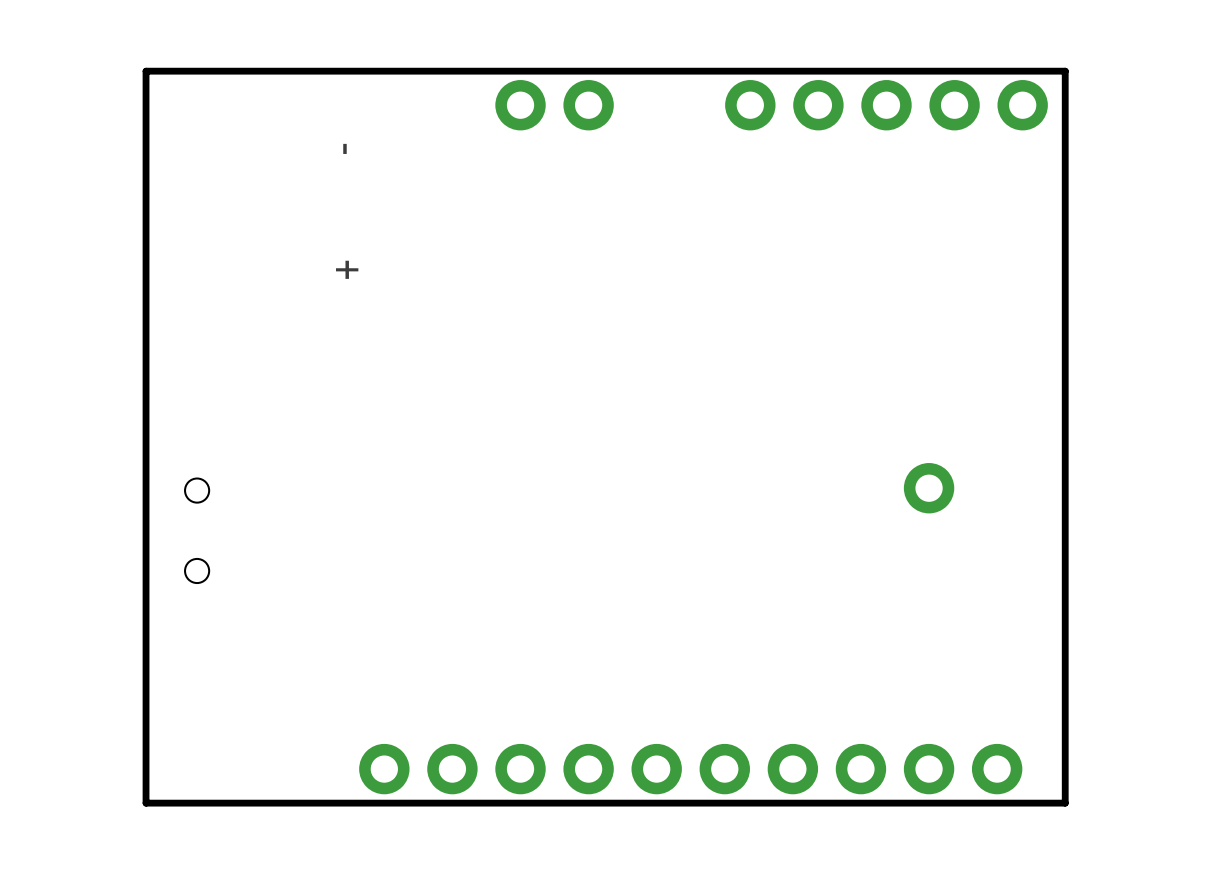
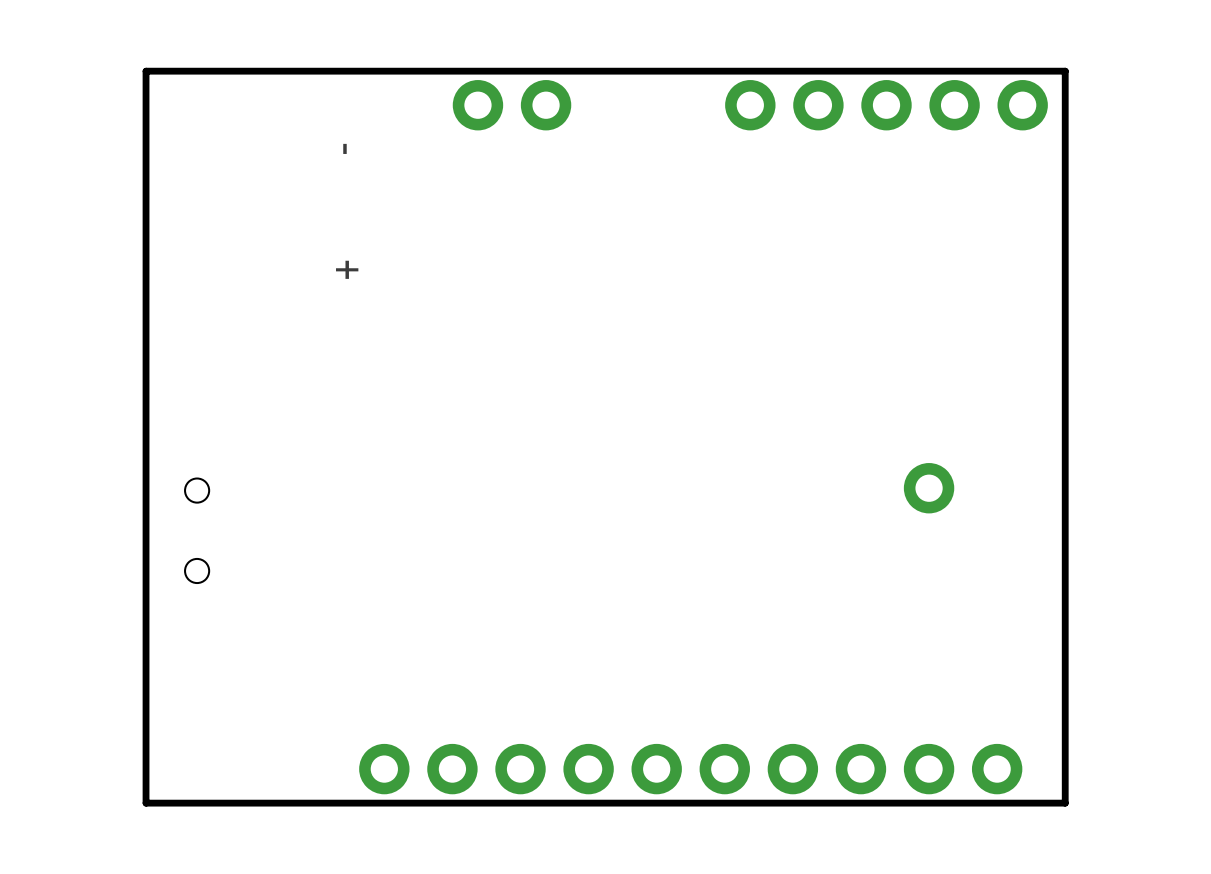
part position: (554, 105) -> (512, 105)

